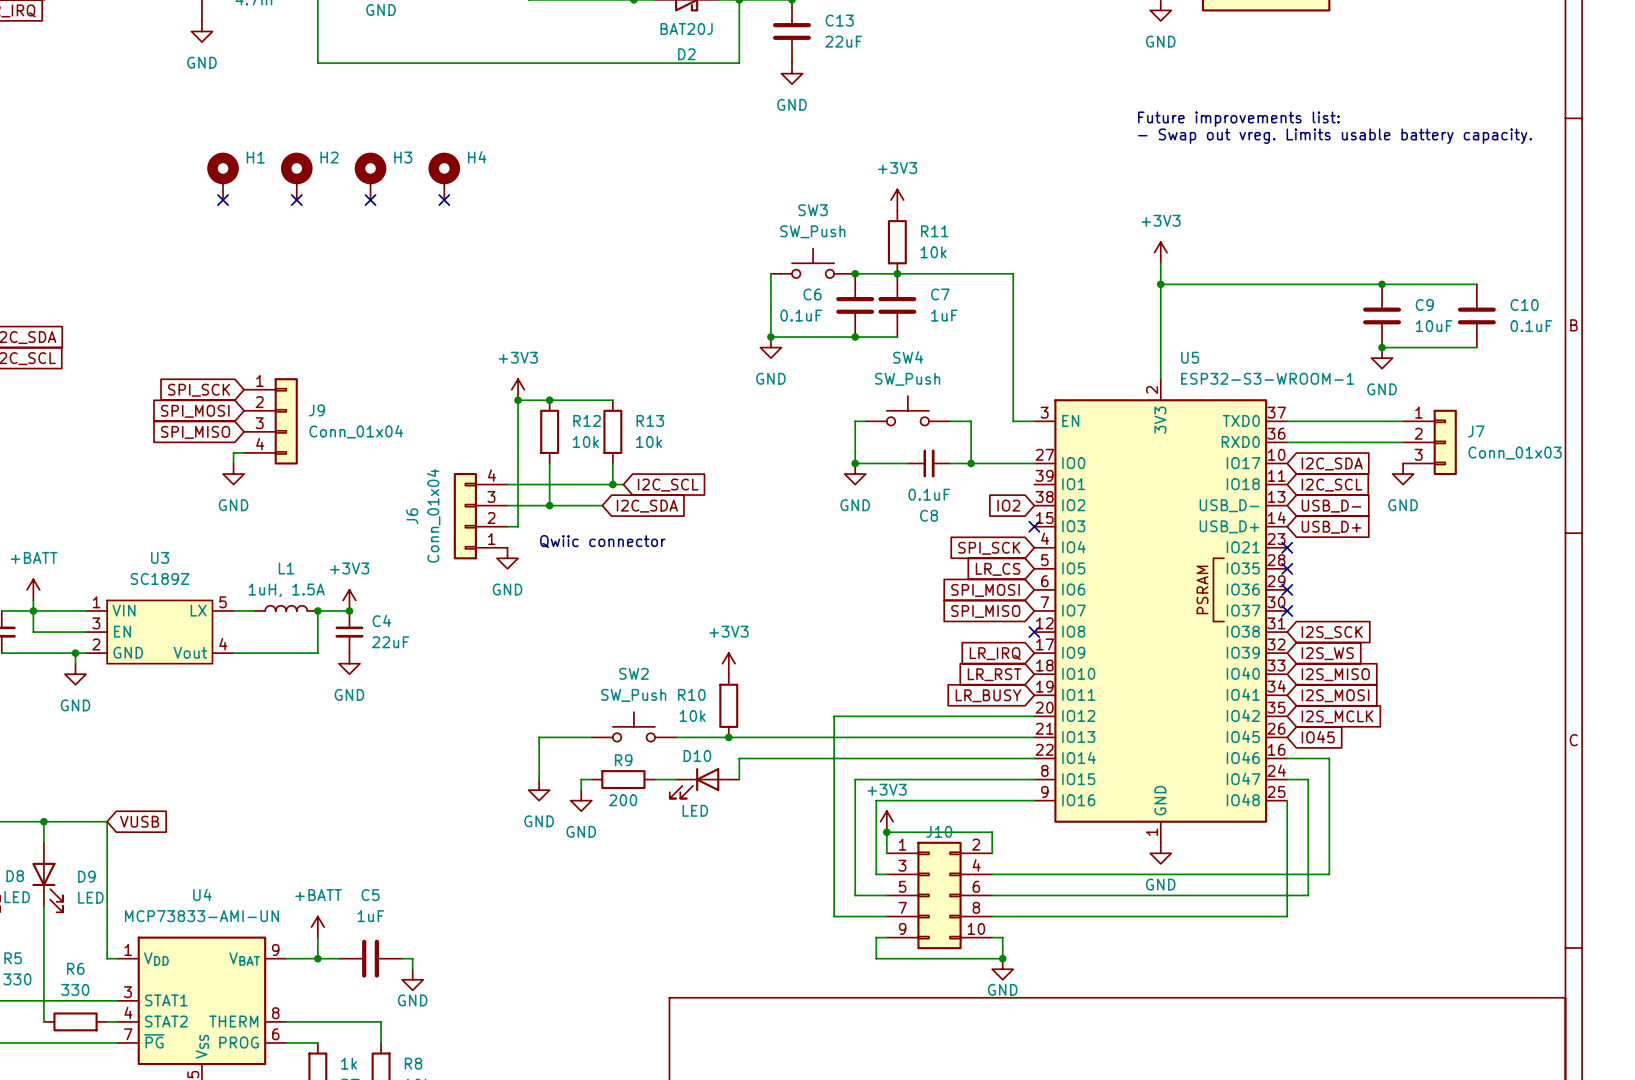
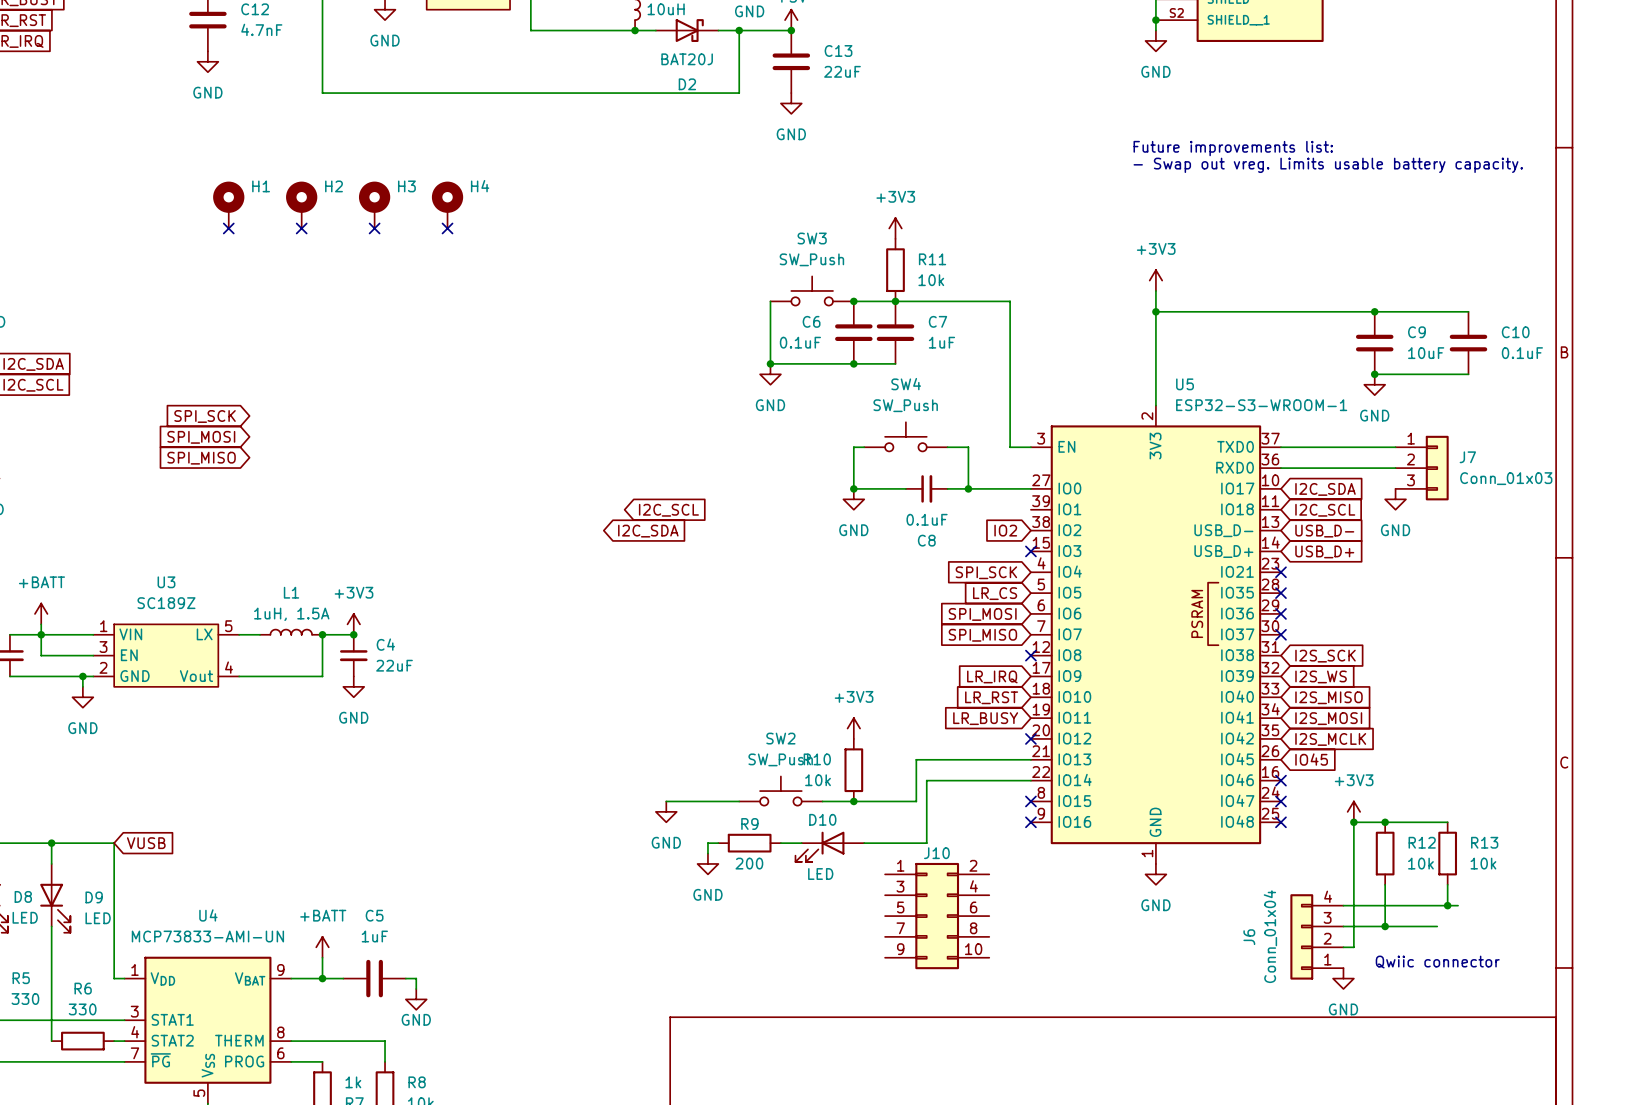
power symbol: +3V3 (518, 389) -> none
junction: (518, 400) -> none
junction: (549, 400) -> none
wire: (612, 400) (518, 400) (518, 526) (507, 526) -> none
J9: Conn_01x04 (270, 421) -> none
R12 position: (549, 431) -> (1385, 853)
R13 position: (612, 431) -> (1447, 853)
wire: (244, 452) (233, 452) (233, 463) -> none
wire: (549, 463) (549, 505) -> none
wire: (612, 463) (612, 484) -> none
power symbol: GND (233, 474) -> none
wire: (507, 484) (623, 484) -> none
junction: (612, 484) -> none
wire: (507, 505) (602, 505) -> none
junction: (549, 505) -> none
J6 position: (480, 516) -> (1316, 936)
text: Qwiic connector (602, 541) -> none
power symbol: GND (507, 558) -> none
power symbol: +3V3 (728, 663) -> none
R10 position: (728, 705) -> (853, 770)
power symbol: none -> +3V3 (853, 728)
wire: (1034, 716) (834, 716) (834, 916) (886, 916) -> none
no-connect mark: none -> (1030, 738)
SW2 position: (633, 726) -> (780, 791)
wire: (591, 737) (539, 737) (539, 779) -> none
wire: (676, 737) (918, 737) -> none
junction: (728, 737) -> none
wire: (928, 758) (739, 758) (739, 779) -> (926, 780) (926, 843) (864, 843)
wire: (1287, 758) (1329, 758) (1329, 874) (992, 874) -> none
no-connect mark: none -> (1280, 780)
wire: (591, 779) (581, 779) (581, 790) -> (718, 843) (707, 843) (707, 853)
R9 position: (623, 779) -> (749, 843)
wire: (655, 779) (665, 779) -> none
wire: (855, 779) (855, 895) (886, 895) -> (853, 801) (822, 801)
junction: none -> (853, 801)
wire: (918, 779) (1034, 779) -> (916, 801) (916, 759)
no-connect mark: none -> (1030, 801)
wire: (1287, 779) (1308, 779) (1308, 895) (992, 895) -> none
no-connect mark: none -> (1280, 801)
D10 position: (704, 783) -> (829, 846)
power symbol: GND (539, 790) -> none
power symbol: none -> GND (666, 811)
power symbol: none -> +3V3 (1353, 811)
power symbol: GND (581, 800) -> none
wire: (1034, 800) (876, 800) (876, 874) (886, 874) -> none
no-connect mark: none -> (1030, 822)
wire: (1287, 800) (1287, 916) (992, 916) -> none
no-connect mark: none -> (1280, 822)
junction: none -> (1353, 822)
junction: none -> (1385, 822)
wire: none -> (1447, 822) (1353, 822) (1353, 947) (1343, 947)
wire: none -> (780, 843) (801, 843)
power symbol: +3V3 (886, 821) -> none
junction: (886, 832) -> none
power symbol: none -> GND (707, 863)
wire: (886, 853) (886, 832) (992, 832) (992, 853) -> none
wire: none -> (1385, 884) (1385, 926)
wire: none -> (1447, 884) (1447, 905)
wire: none -> (1343, 905) (1458, 905)
junction: none -> (1447, 905)
wire: none -> (1343, 926) (1437, 926)
junction: none -> (1385, 926)
wire: (886, 937) (876, 937) (876, 958) (1002, 958) (1002, 937) (992, 937) -> none
text: none -> Qwiic connector (1437, 962)
junction: (1002, 958) -> none
power symbol: none -> GND (1343, 978)
power symbol: GND (1002, 969) -> none

